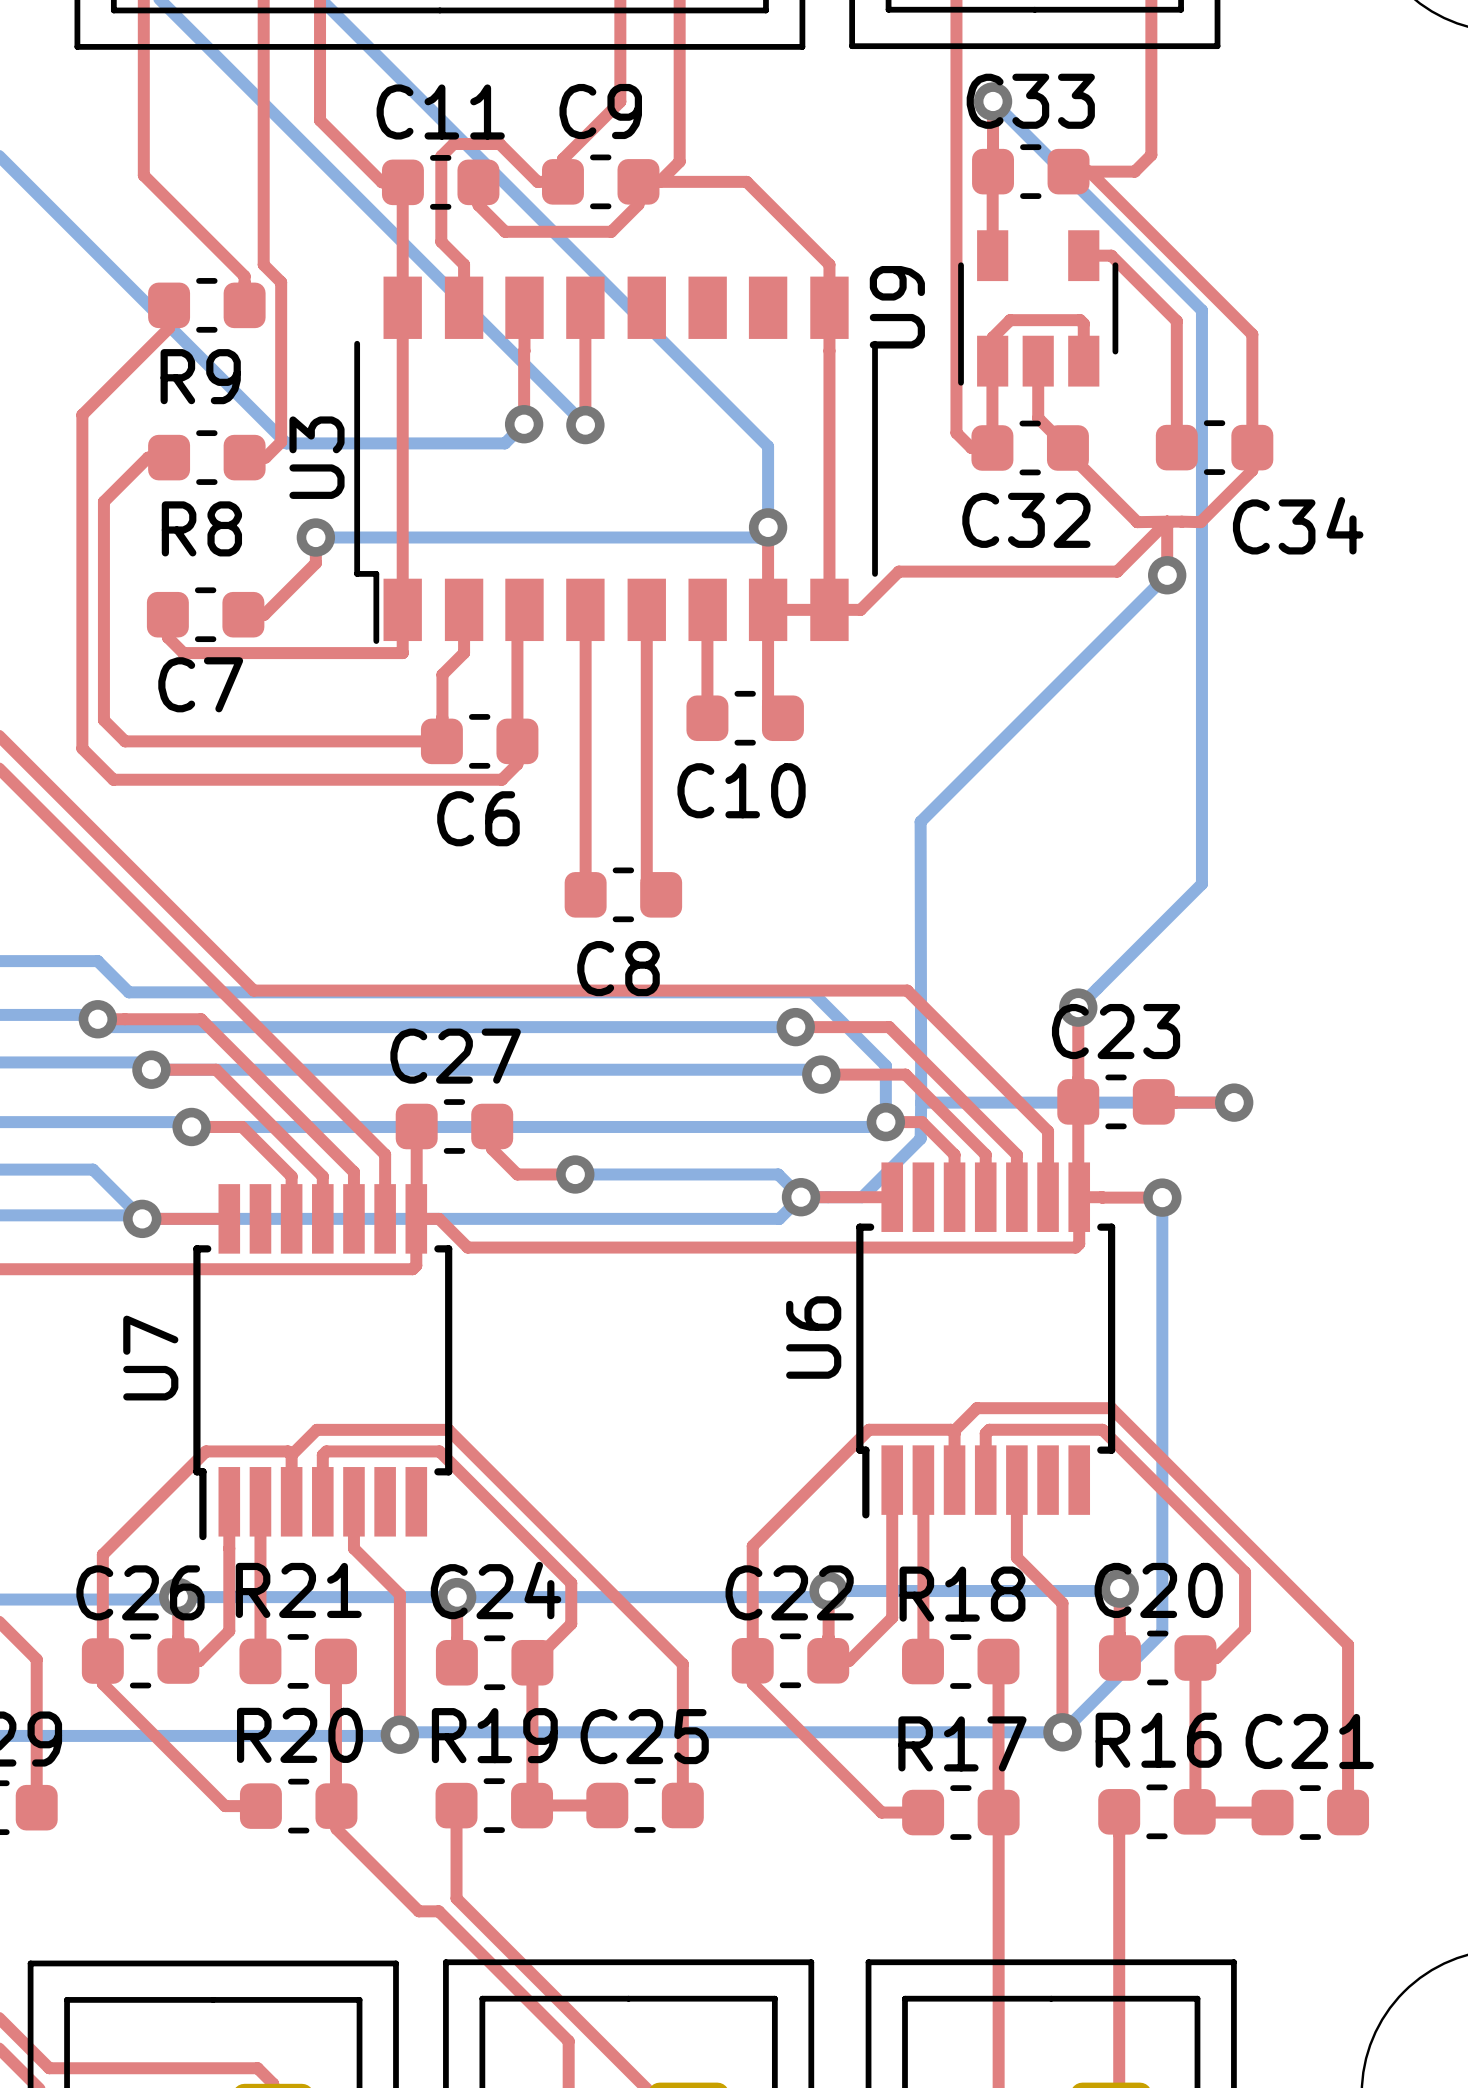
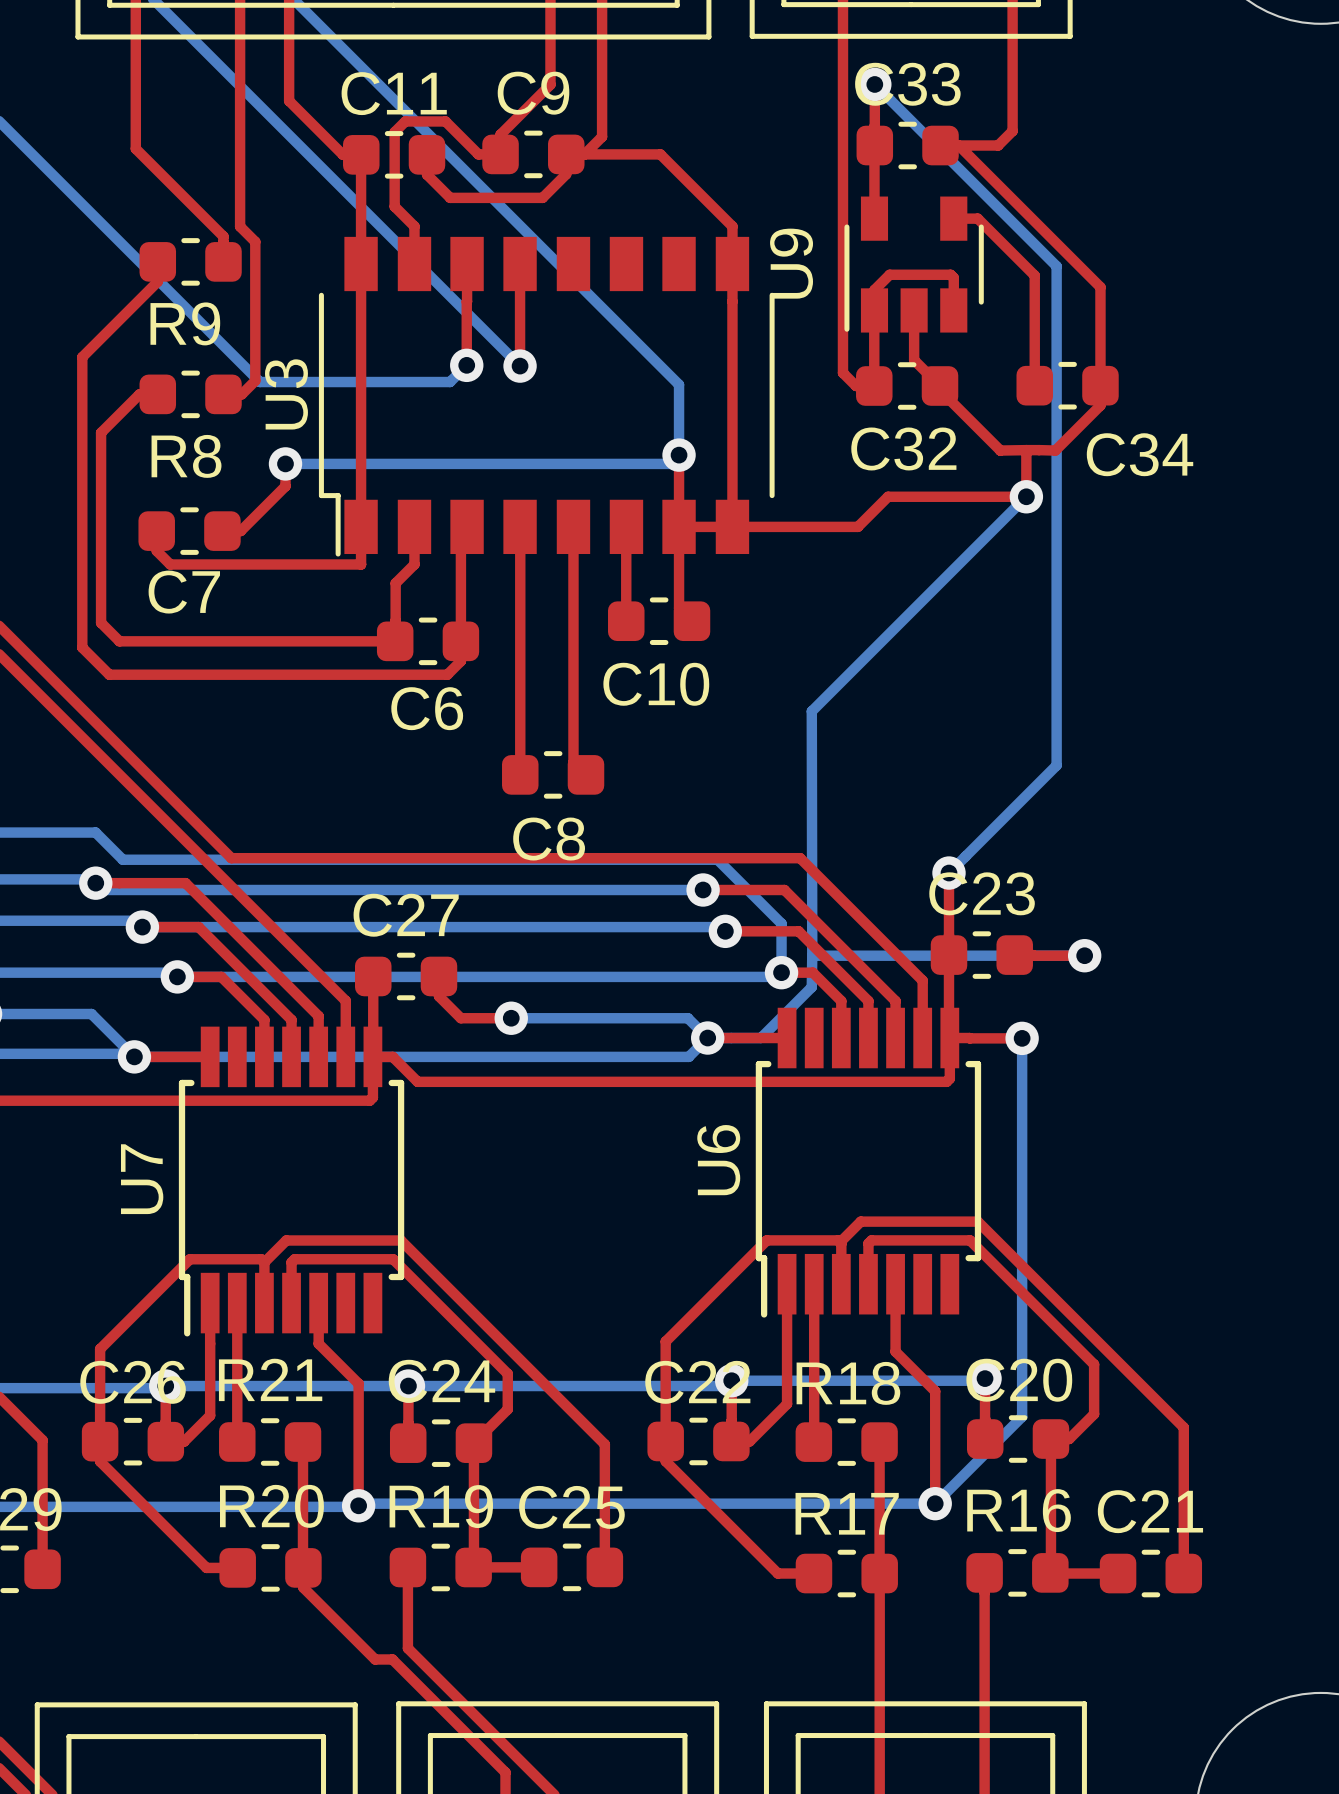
top track: (1167, 521) (1117, 571) (898, 571) (860, 609) -> (1026, 496) (888, 496) (857, 526) (759, 526)

